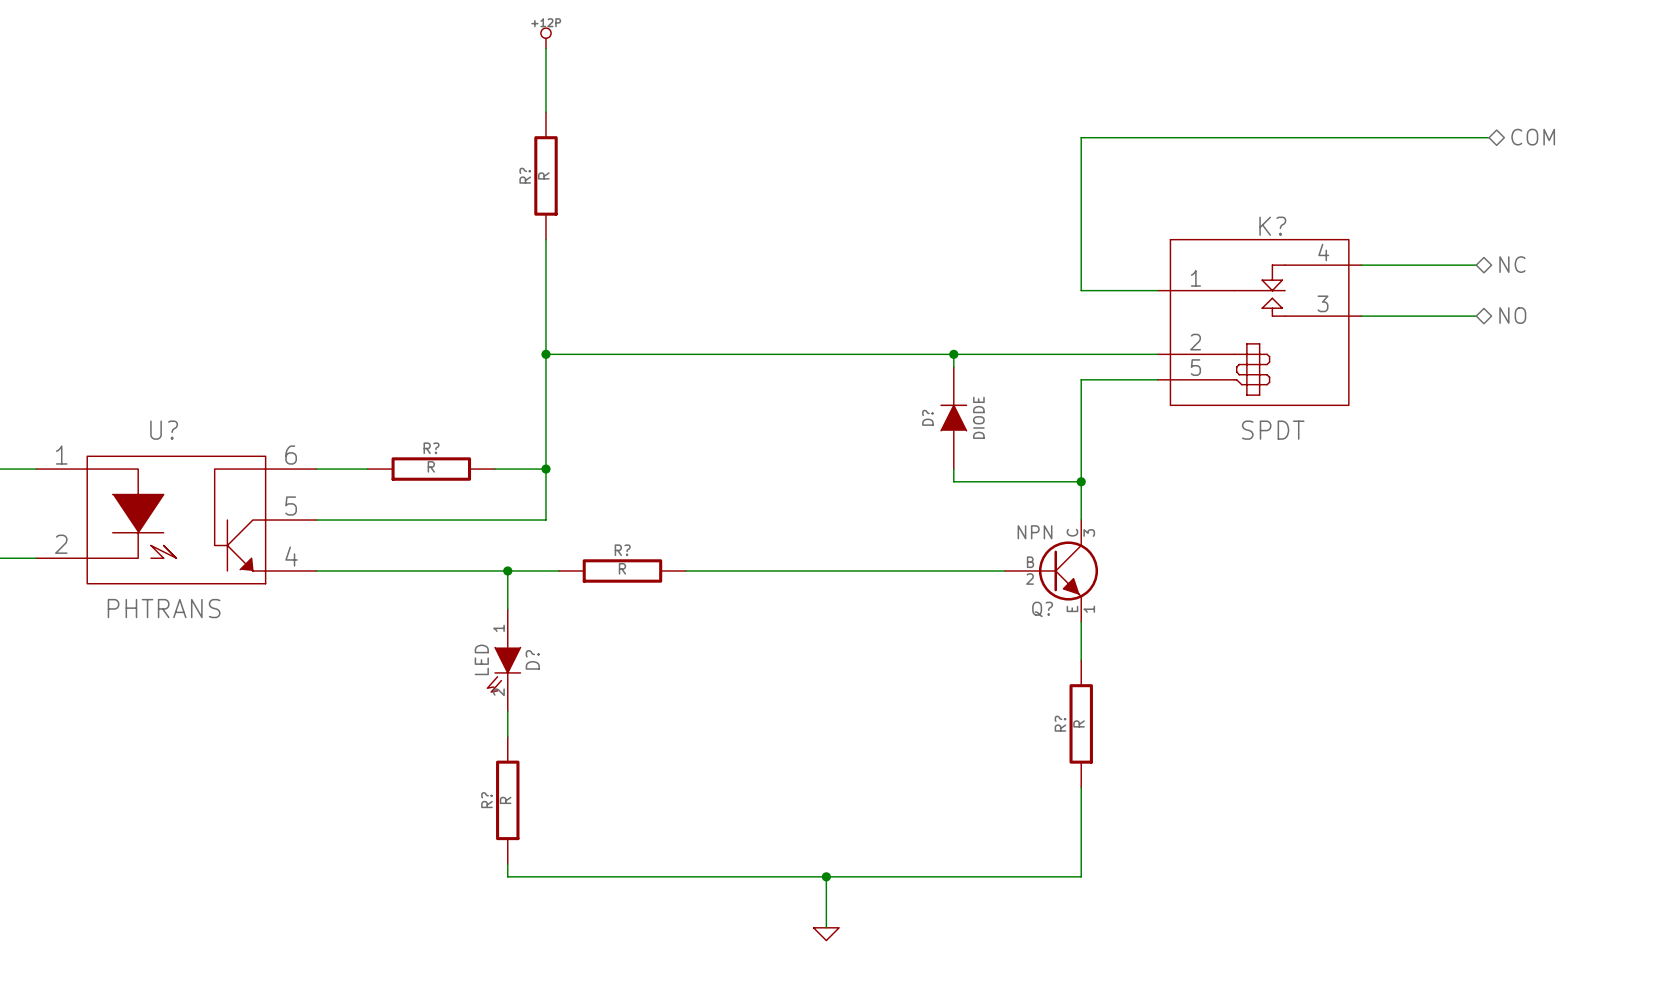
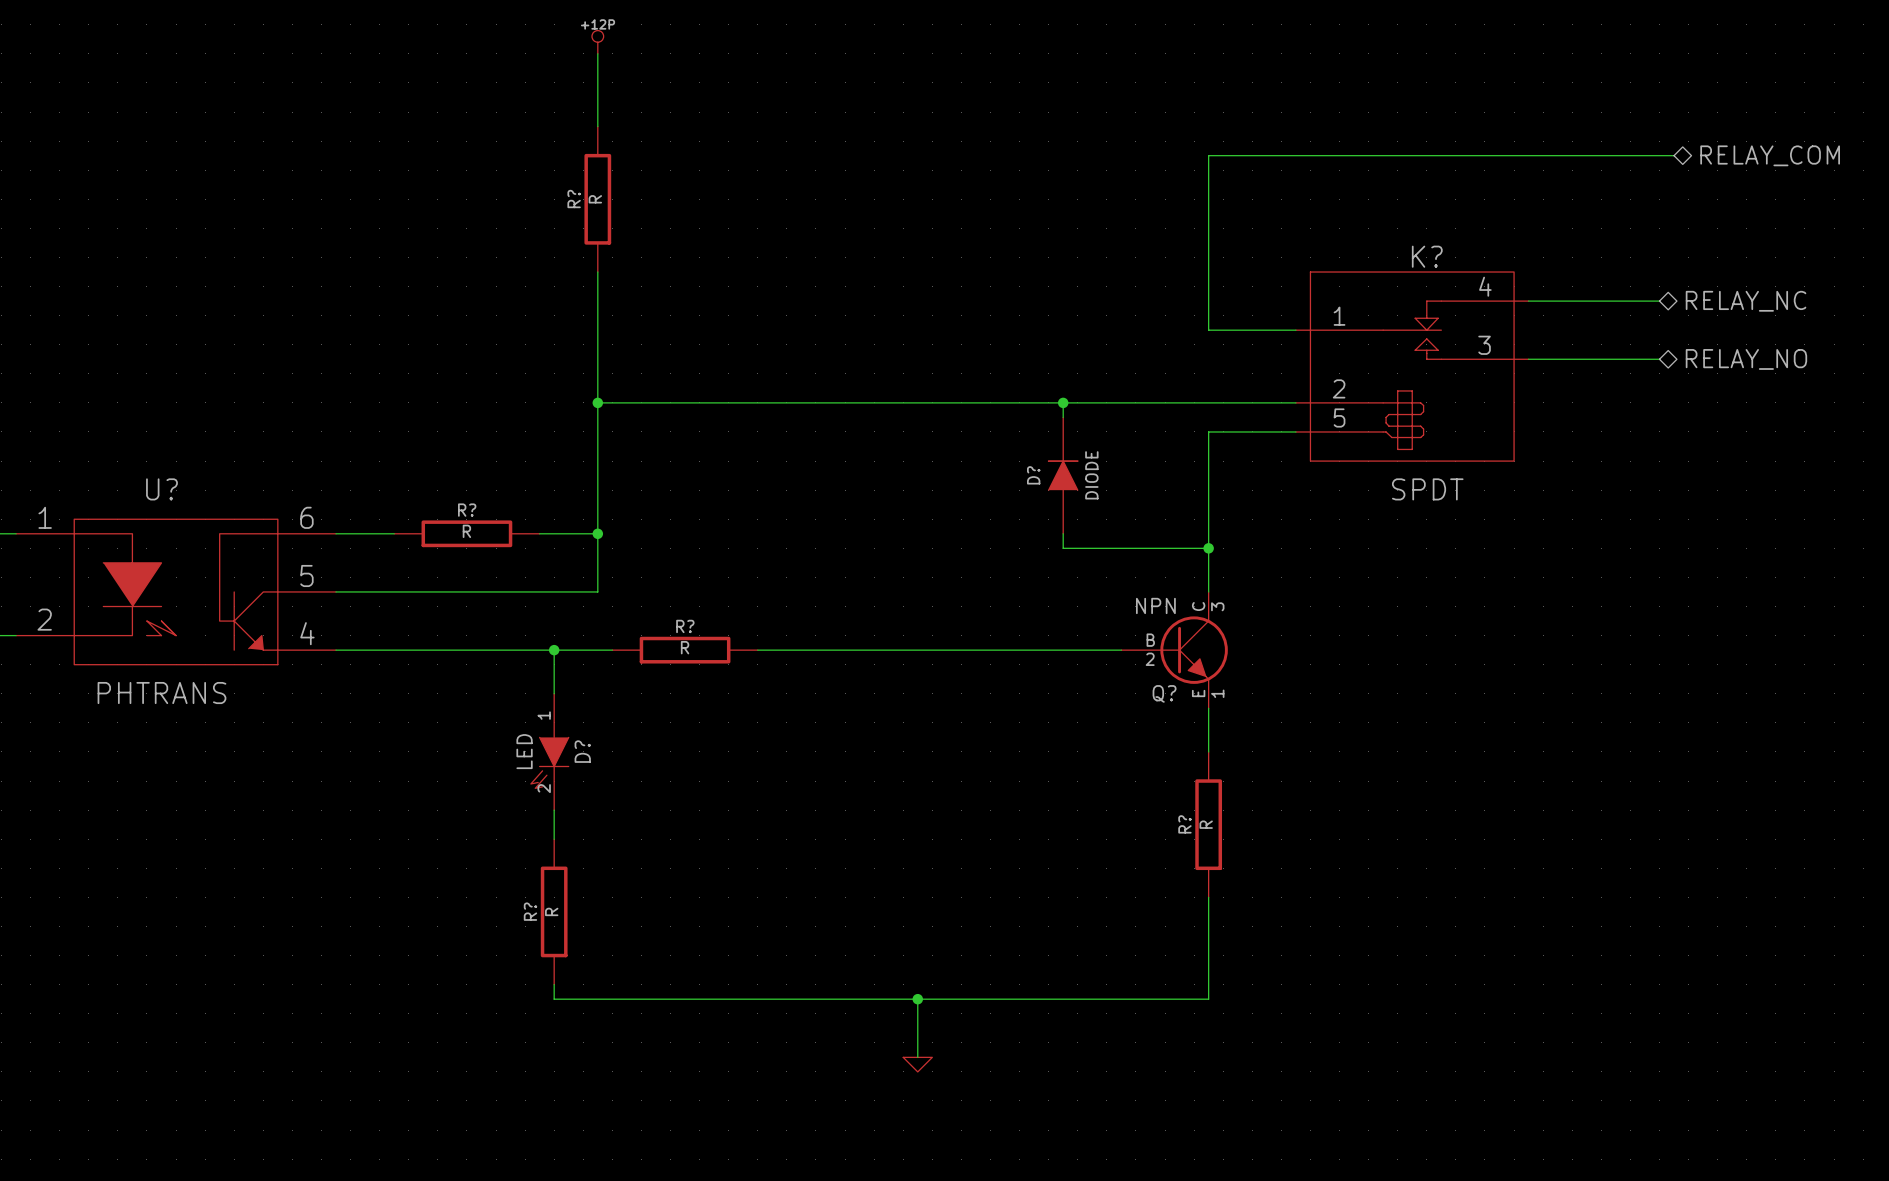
hierarchical label: COM (1533, 137) -> RELAY_COM (1770, 155)
hierarchical label: NC (1512, 264) -> RELAY_NC (1746, 301)
hierarchical label: NO (1512, 315) -> RELAY_NO (1746, 359)

